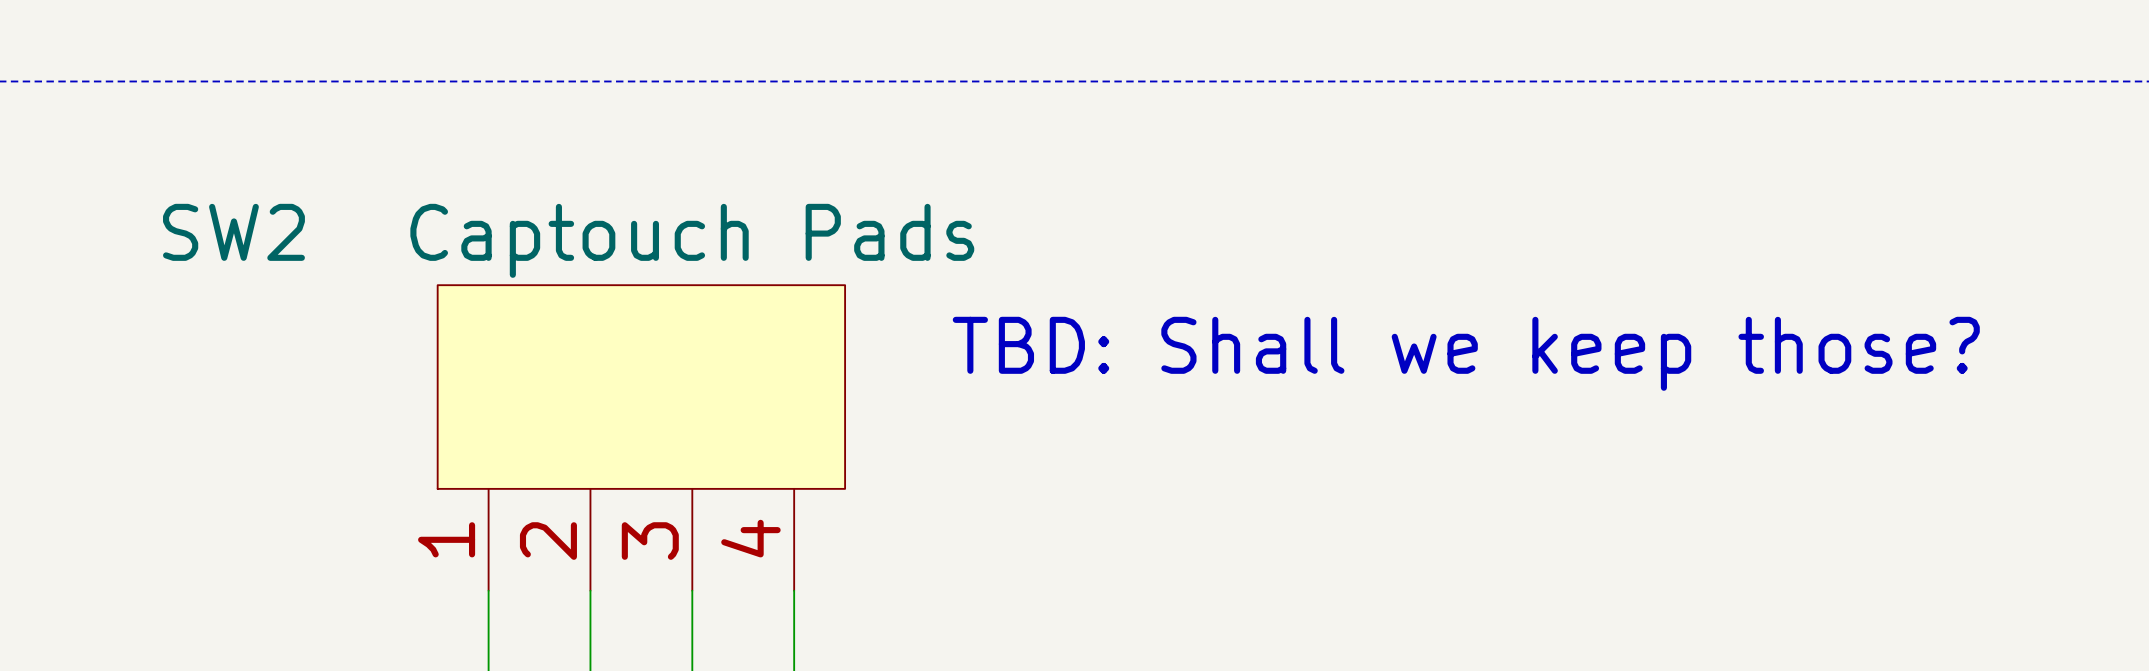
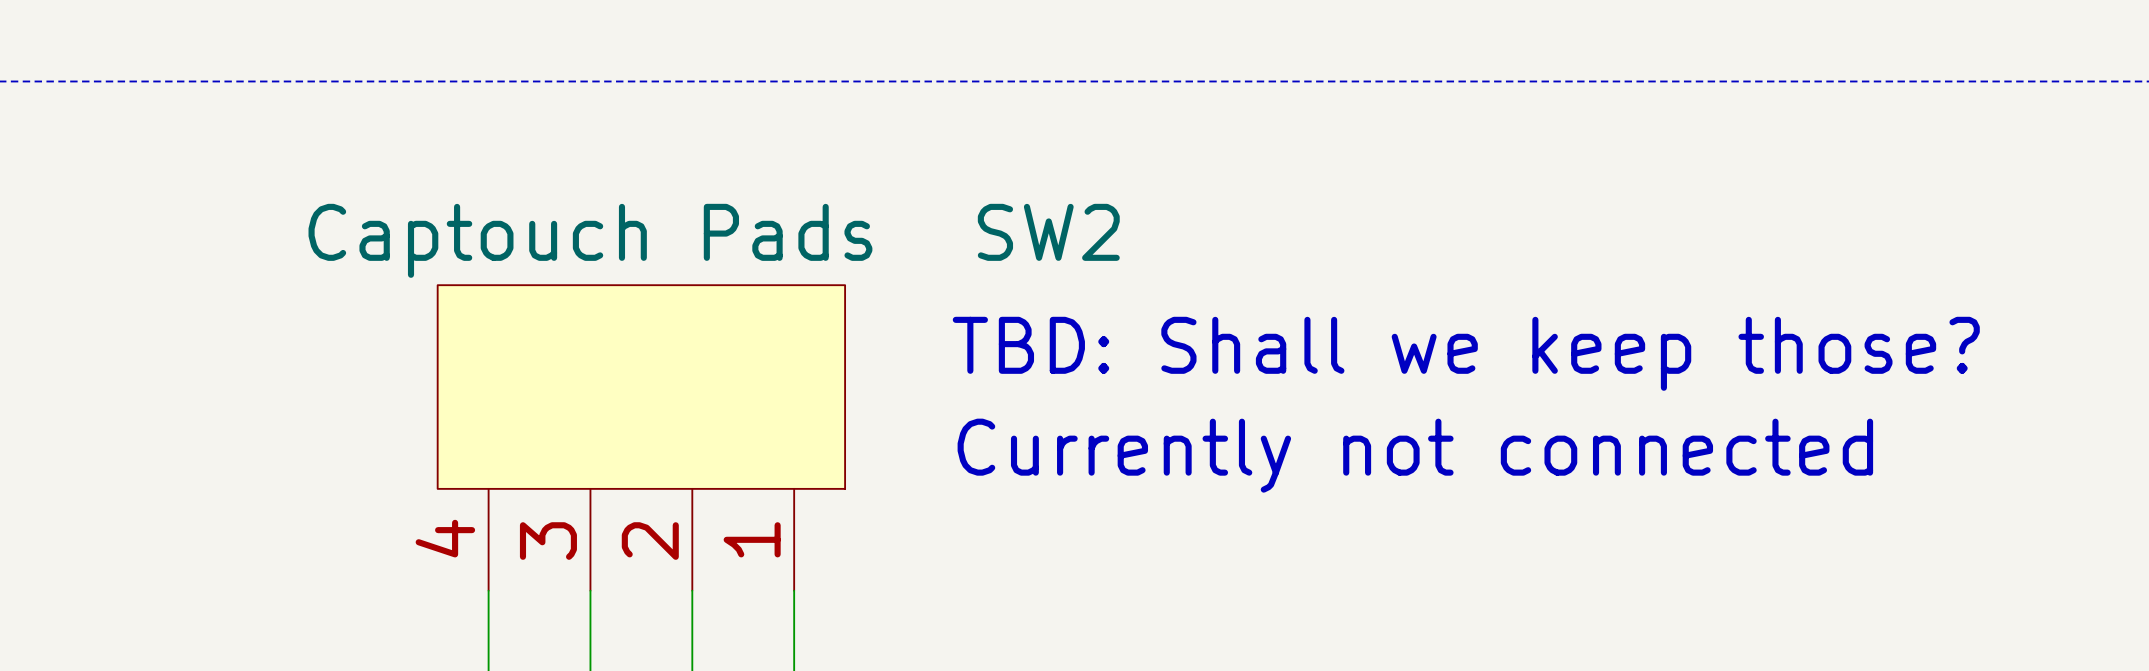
SW2 flip: as is (641, 387) -> left-right (641, 387)
text: none -> Currently not connected (1415, 455)

